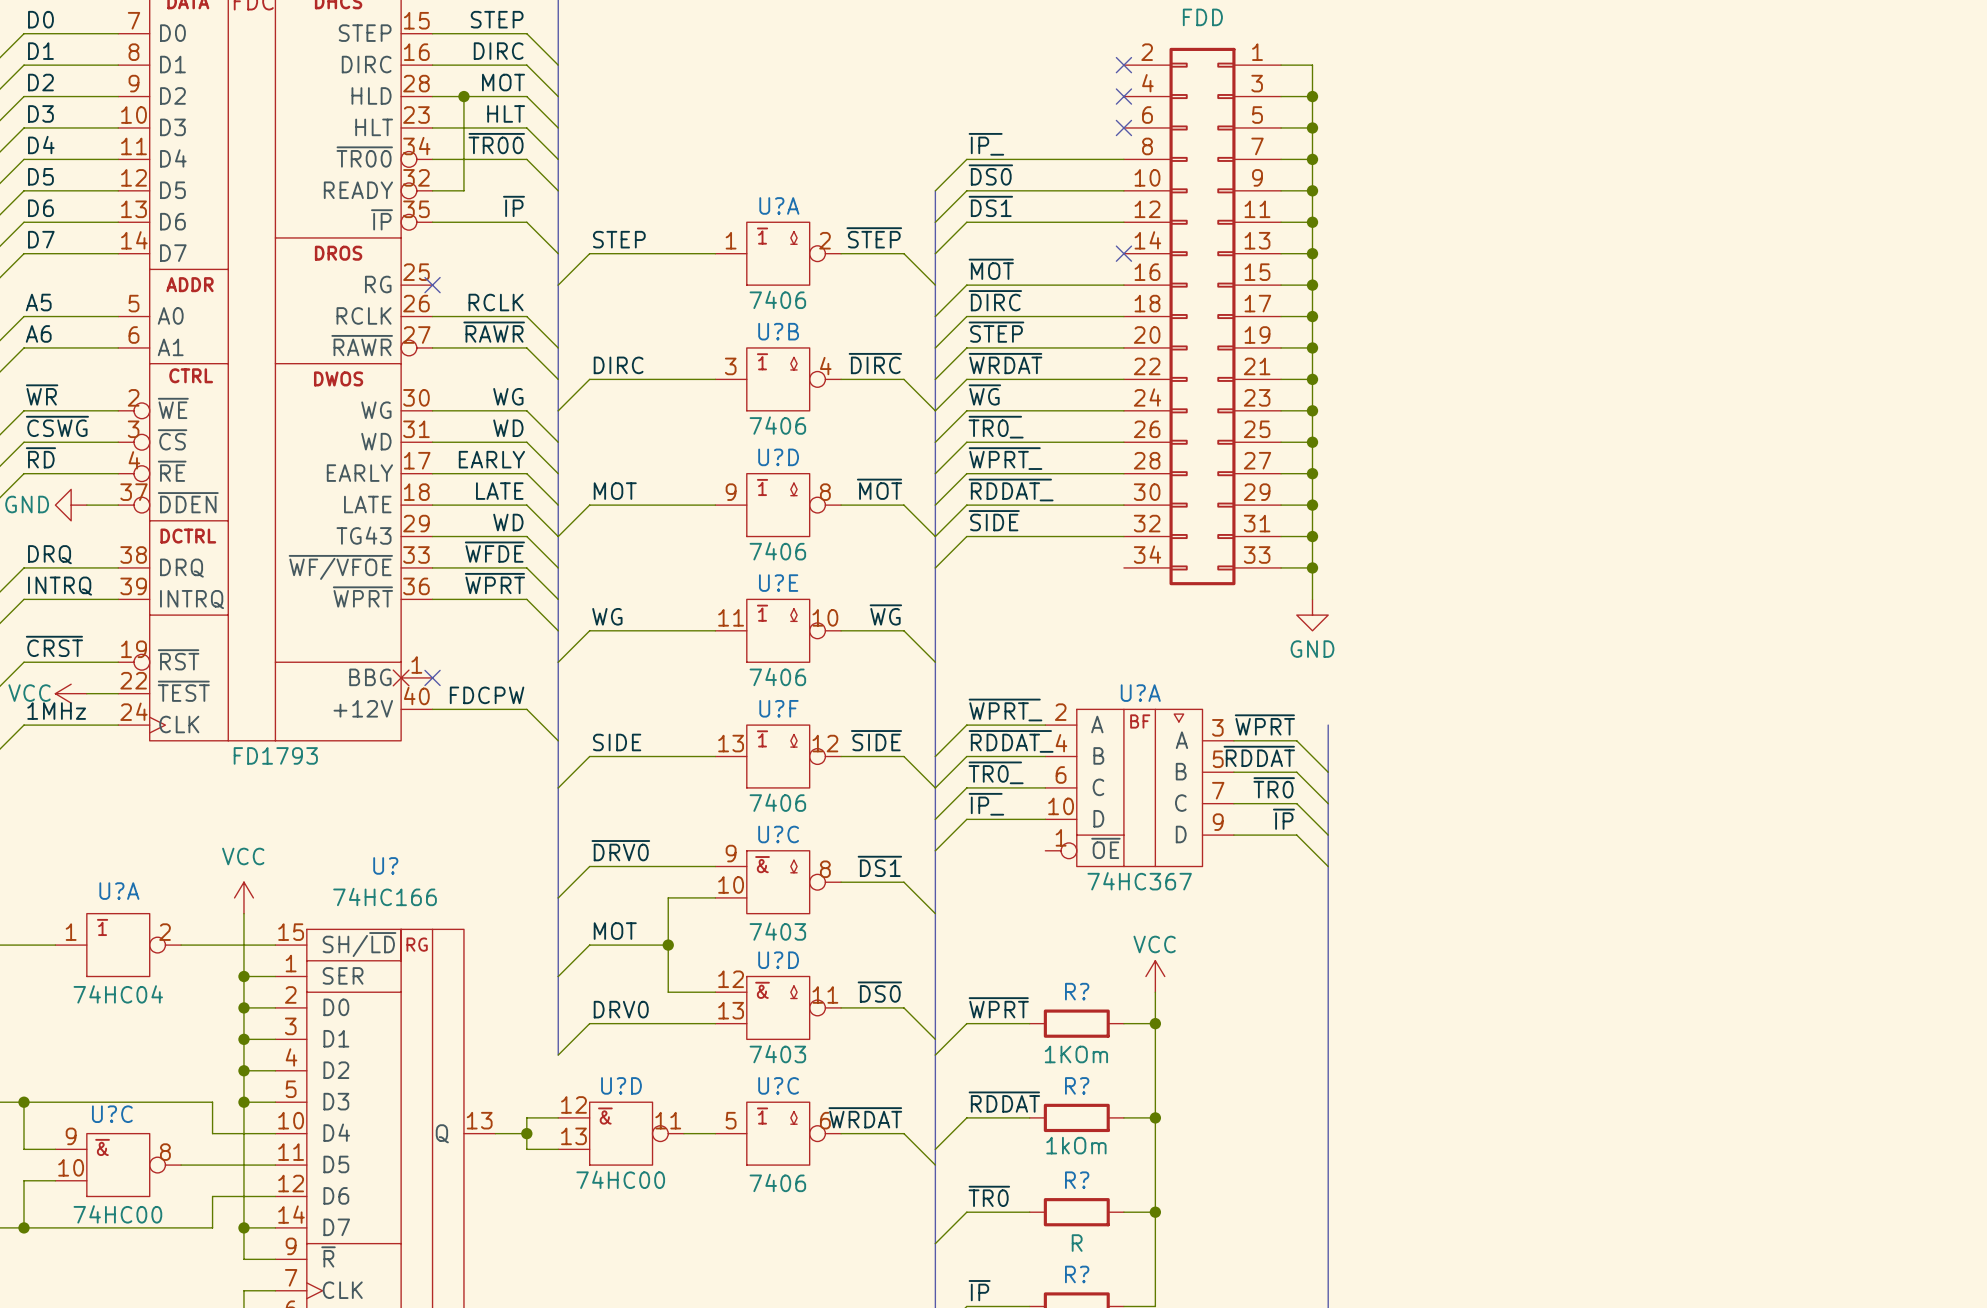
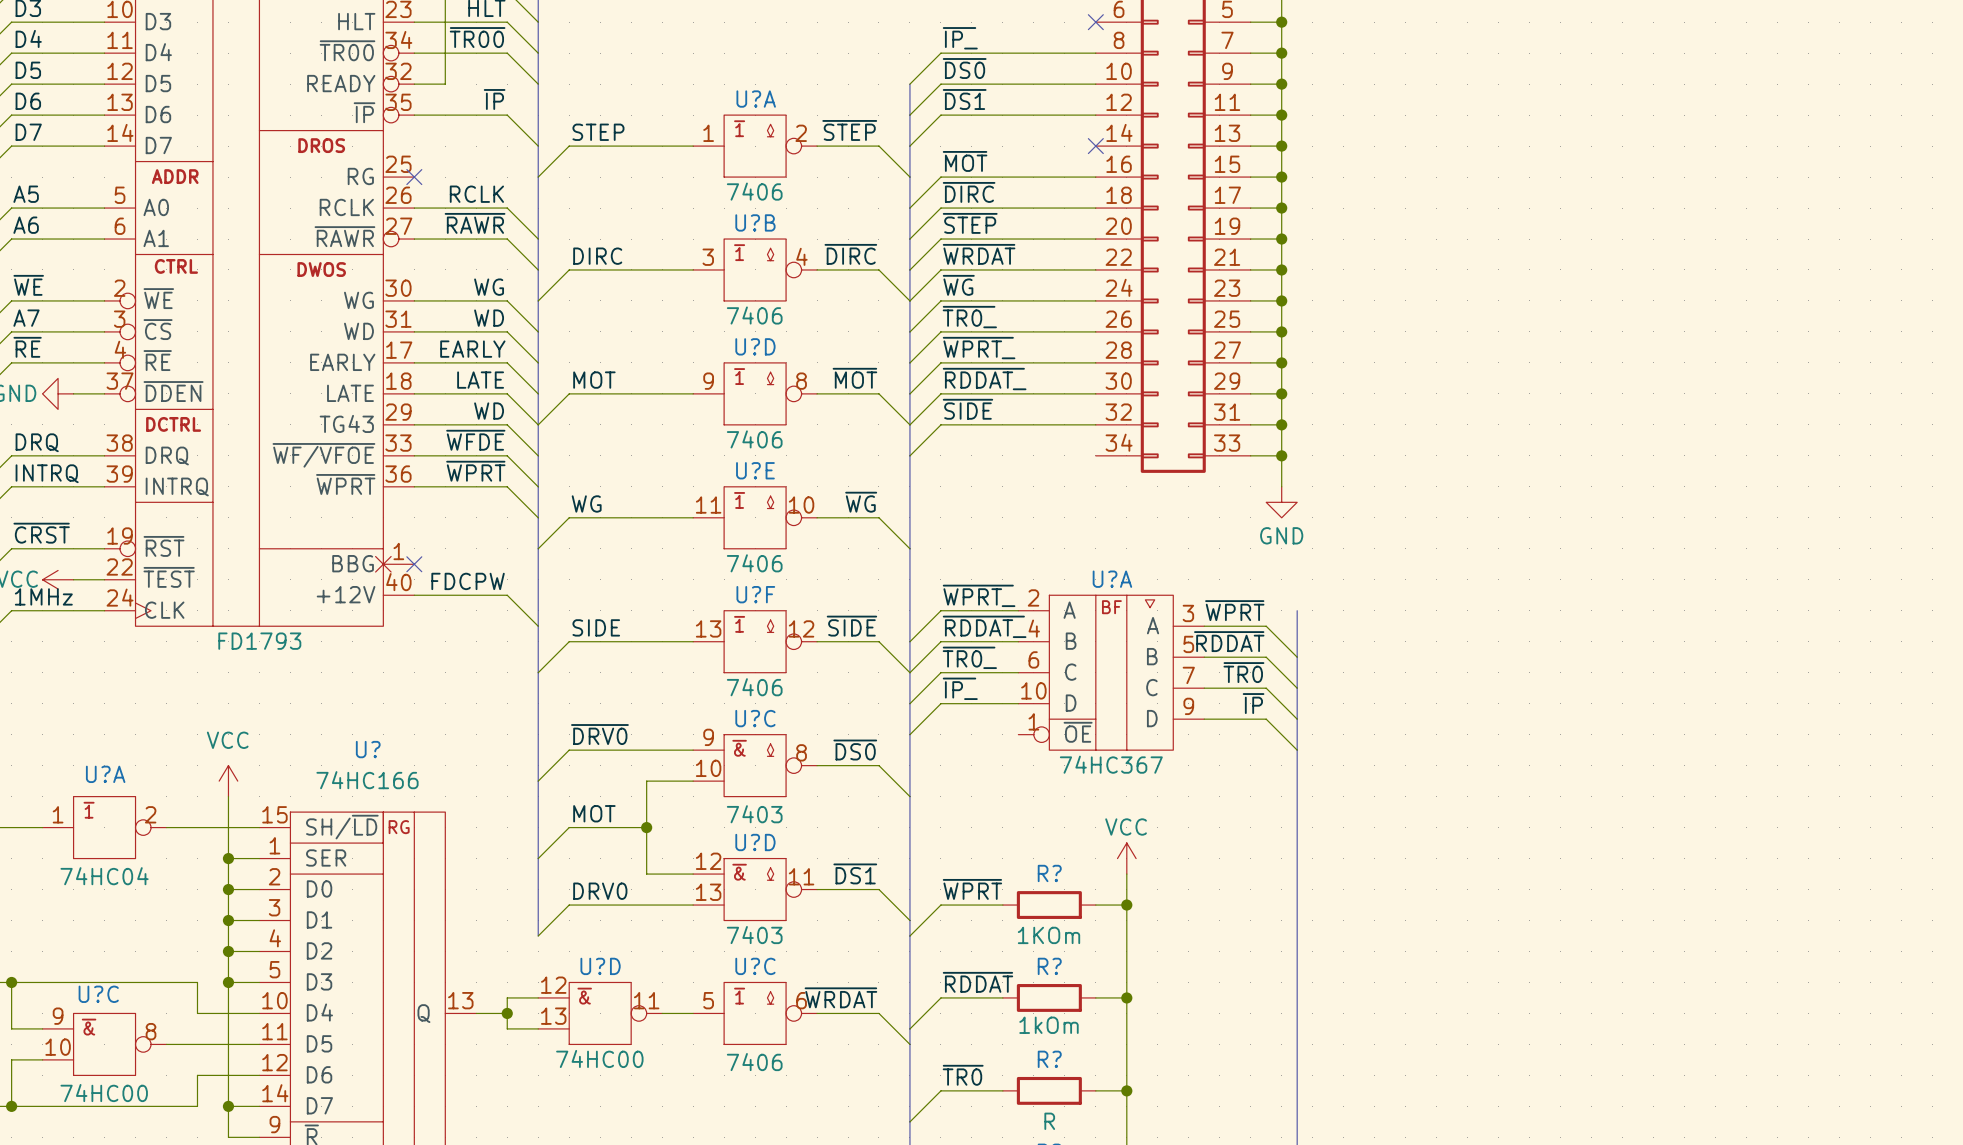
label: ~{WR} (42, 394) -> ~{WE} (28, 285)
label: ~{CSWG} (57, 426) -> A7 (26, 318)
label: ~{RD} (40, 457) -> ~{RE} (27, 347)
label: ~{DS1} (879, 866) -> ~{DS0} (855, 750)
label: ~{DS0} (879, 992) -> ~{DS1} (855, 873)

